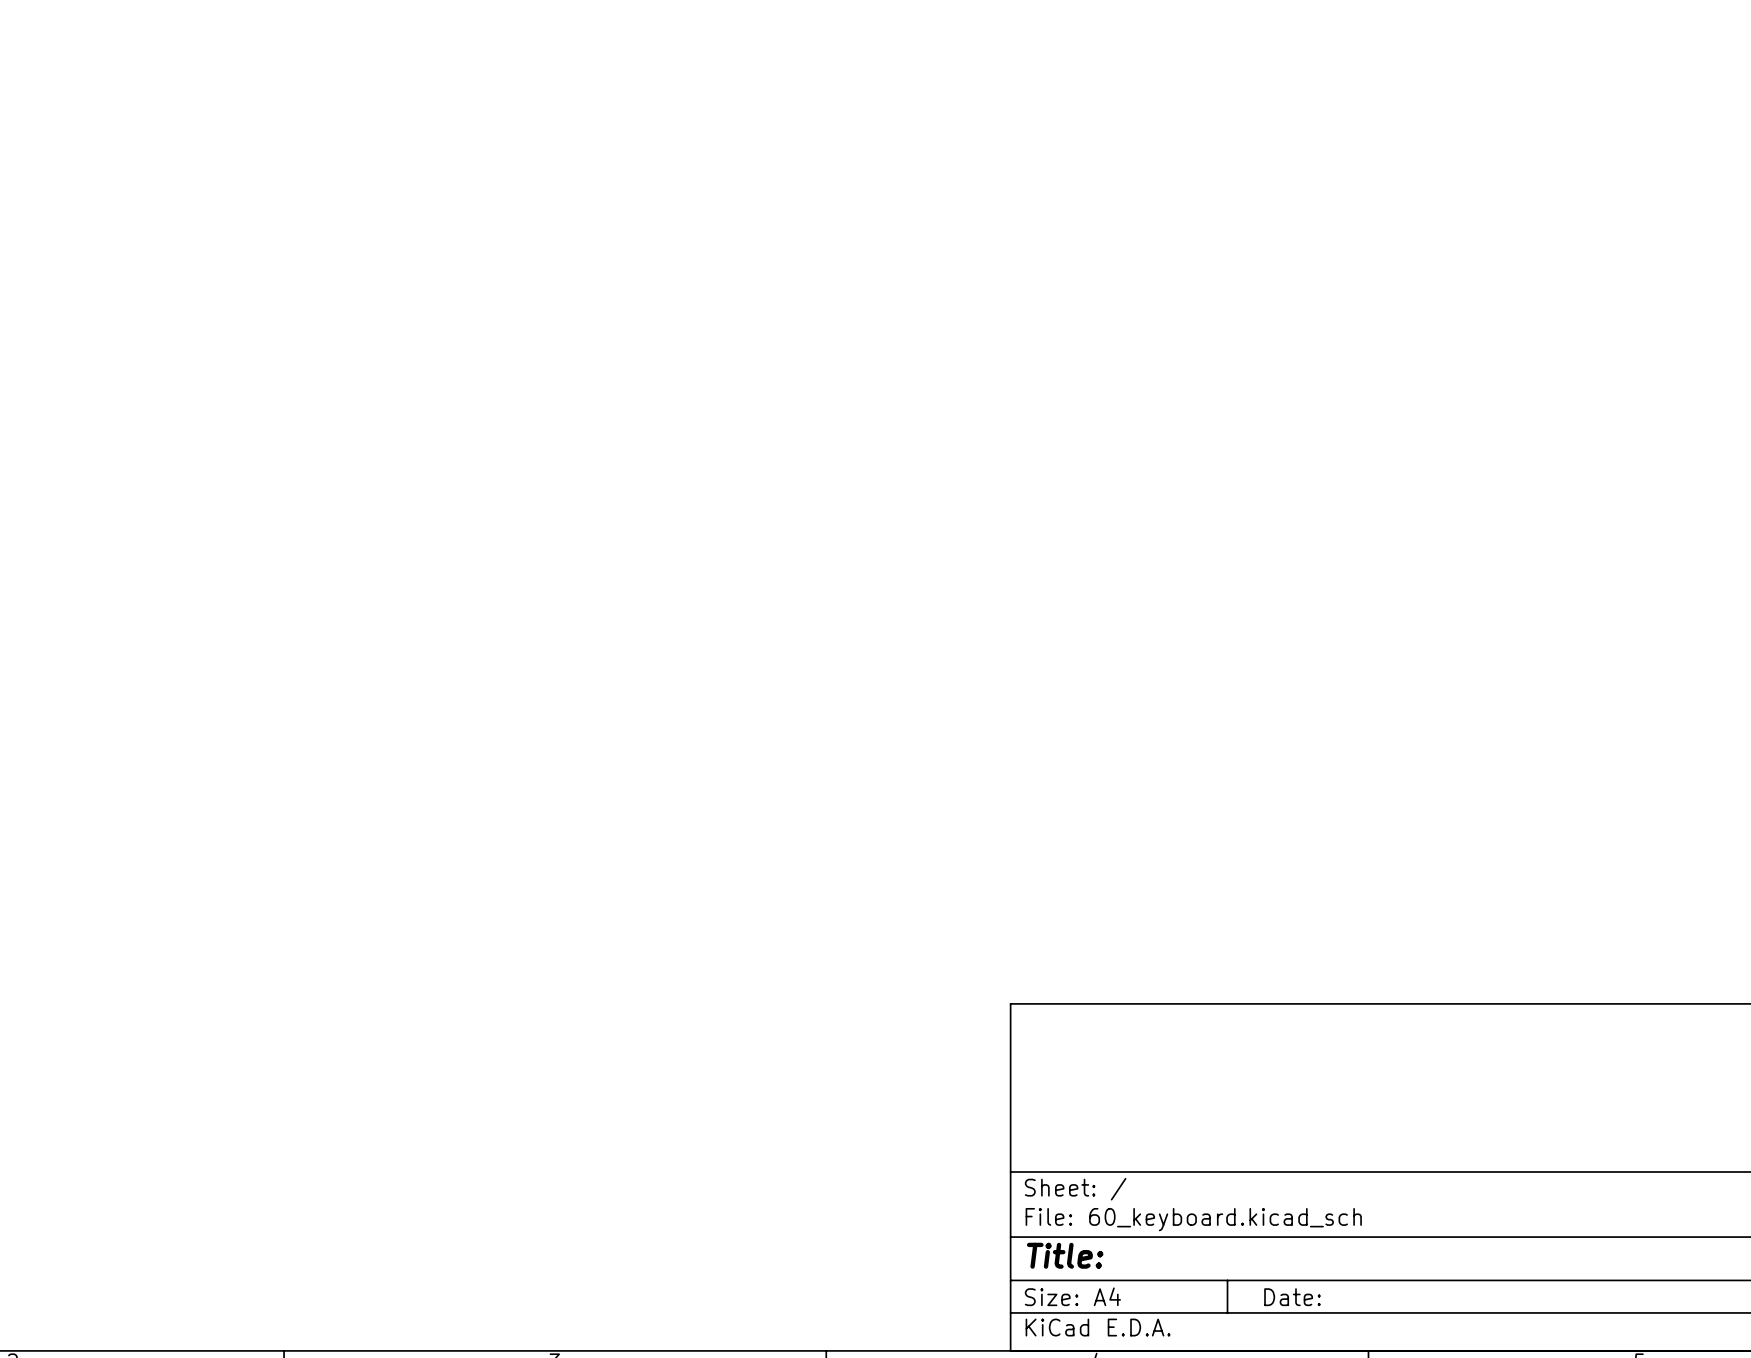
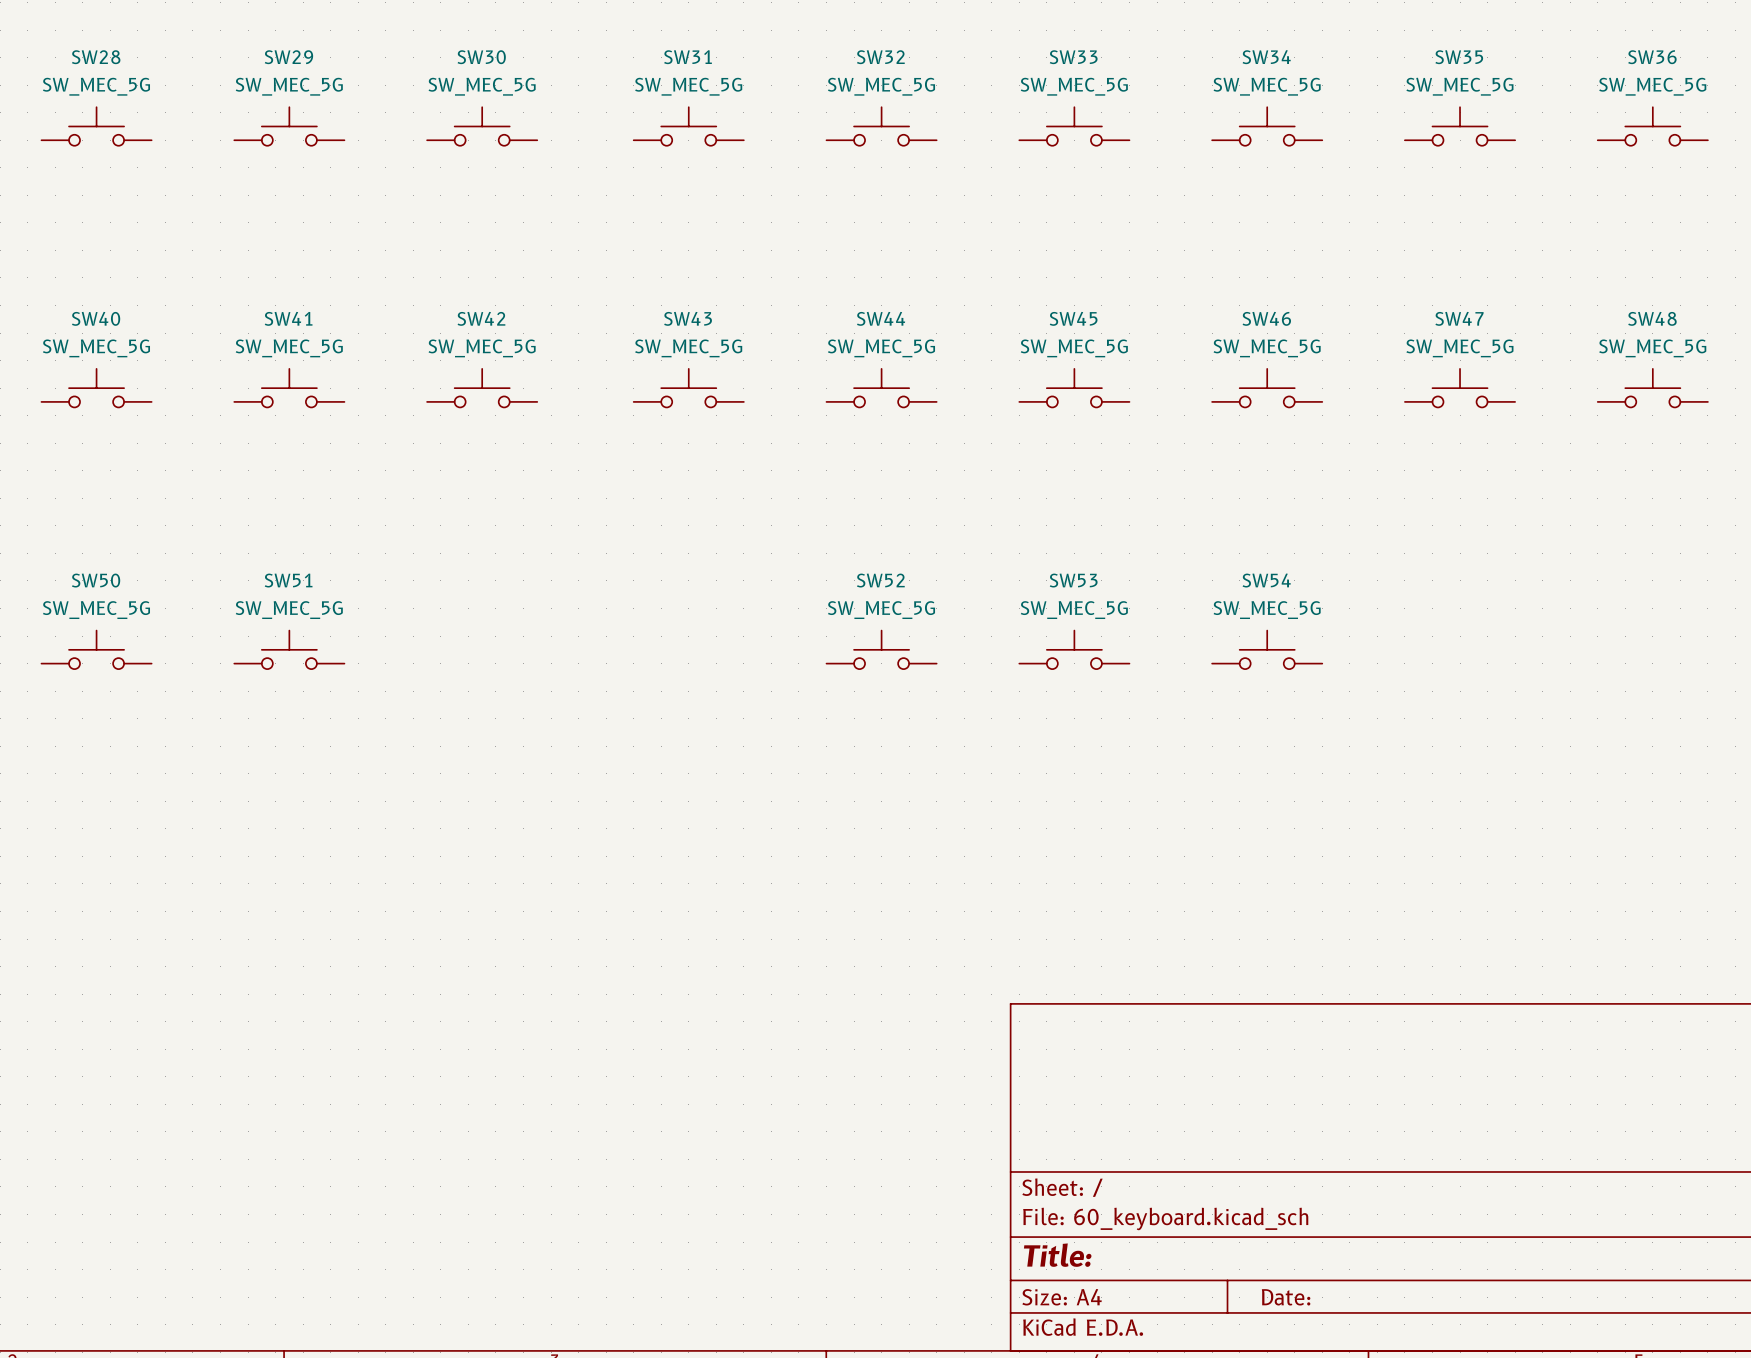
SW28: none -> SW_MEC_5G (96, 126)
SW29: none -> SW_MEC_5G (289, 126)
SW30: none -> SW_MEC_5G (482, 126)
SW31: none -> SW_MEC_5G (688, 126)
SW32: none -> SW_MEC_5G (881, 126)
SW33: none -> SW_MEC_5G (1074, 126)
SW34: none -> SW_MEC_5G (1267, 126)
SW35: none -> SW_MEC_5G (1460, 126)
SW36: none -> SW_MEC_5G (1652, 126)
SW40: none -> SW_MEC_5G (96, 388)
SW41: none -> SW_MEC_5G (289, 388)
SW42: none -> SW_MEC_5G (482, 388)
SW43: none -> SW_MEC_5G (688, 388)
SW44: none -> SW_MEC_5G (881, 388)
SW45: none -> SW_MEC_5G (1074, 388)
SW46: none -> SW_MEC_5G (1267, 388)
SW47: none -> SW_MEC_5G (1460, 388)
SW48: none -> SW_MEC_5G (1652, 388)
SW50: none -> SW_MEC_5G (96, 649)
SW51: none -> SW_MEC_5G (289, 649)
SW52: none -> SW_MEC_5G (881, 649)
SW53: none -> SW_MEC_5G (1074, 649)
SW54: none -> SW_MEC_5G (1267, 649)

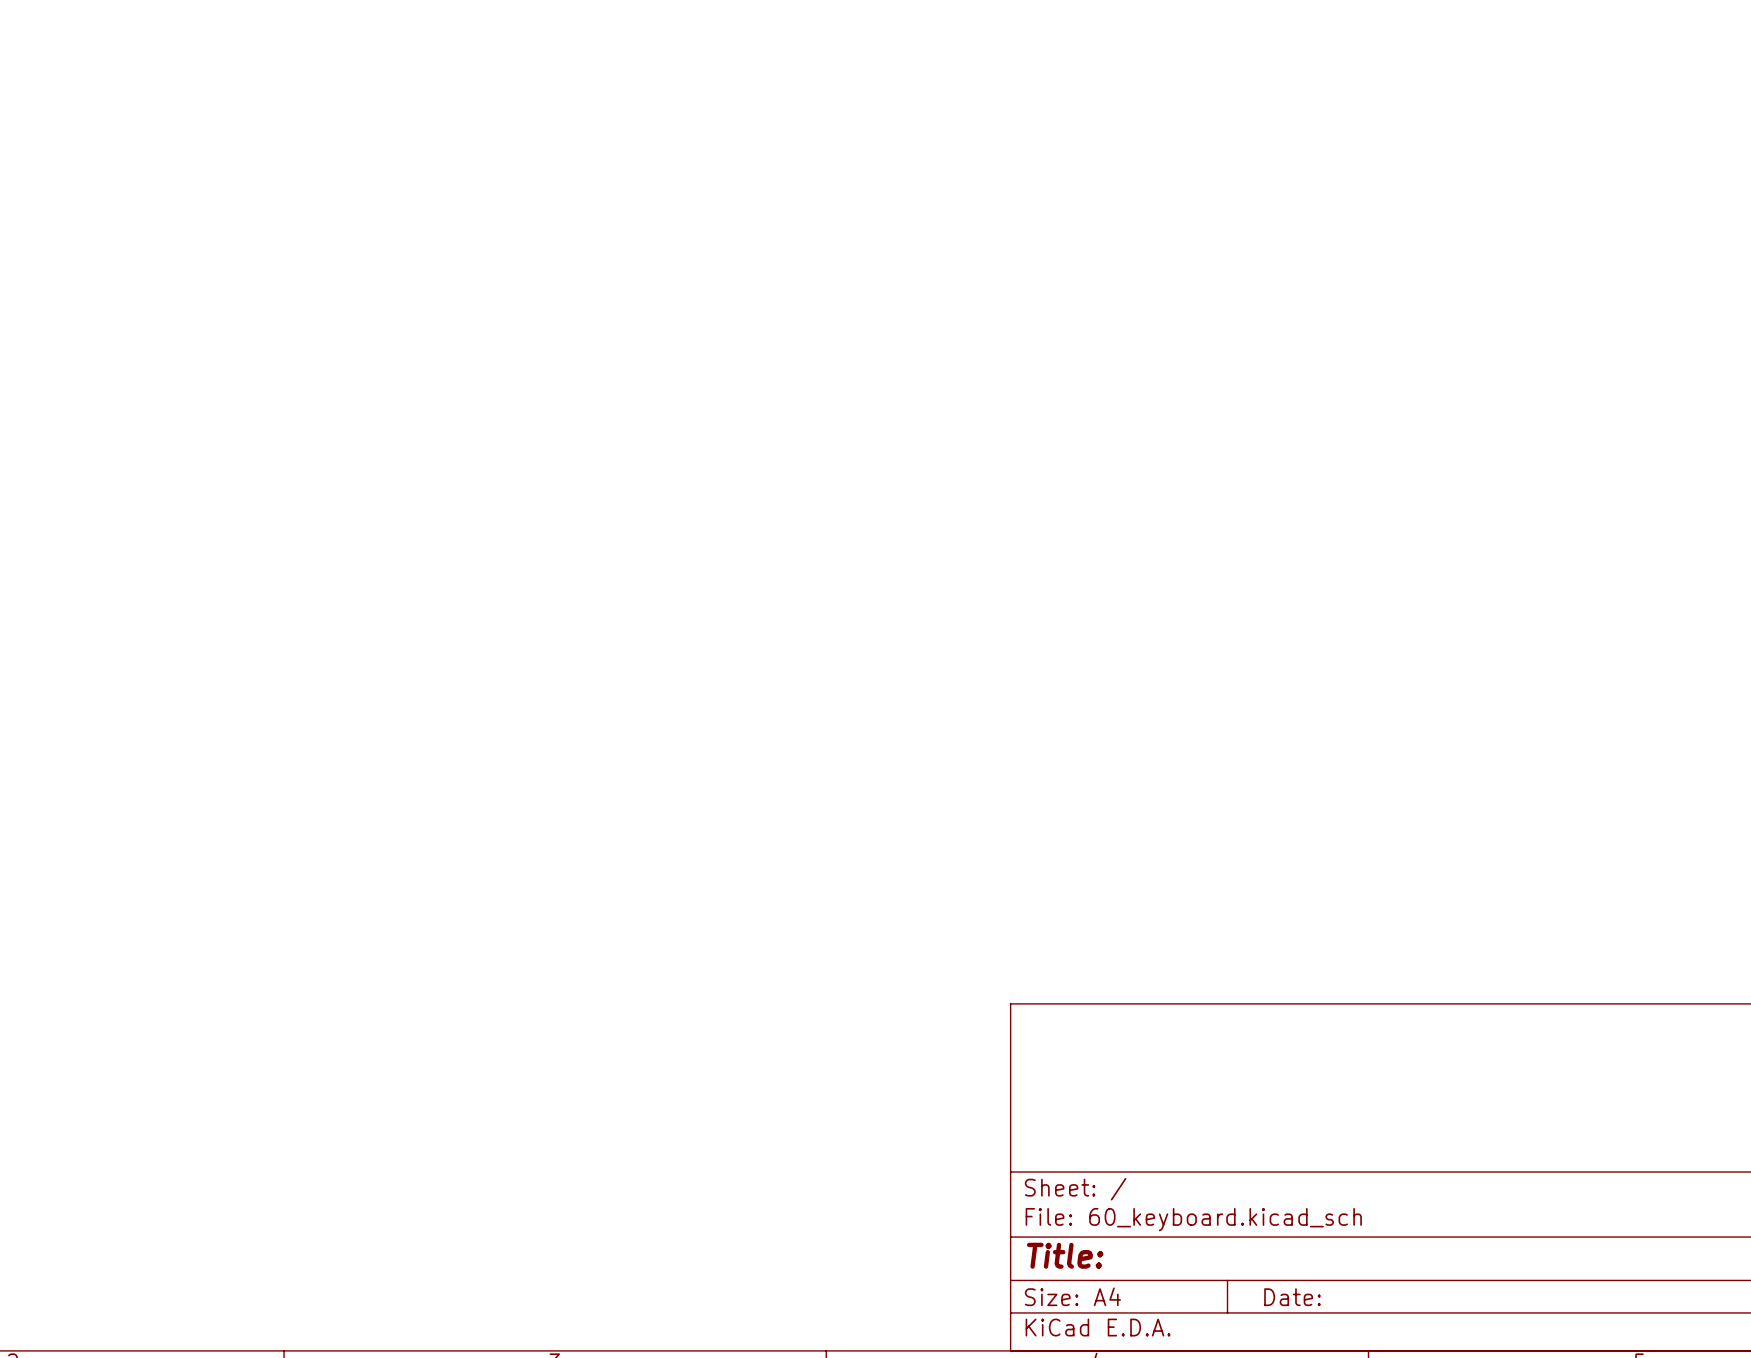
SW28: SW_MEC_5G (96, 126) -> none
SW29: SW_MEC_5G (289, 126) -> none
SW30: SW_MEC_5G (482, 126) -> none
SW31: SW_MEC_5G (688, 126) -> none
SW32: SW_MEC_5G (881, 126) -> none
SW33: SW_MEC_5G (1074, 126) -> none
SW34: SW_MEC_5G (1267, 126) -> none
SW35: SW_MEC_5G (1460, 126) -> none
SW36: SW_MEC_5G (1652, 126) -> none
SW40: SW_MEC_5G (96, 388) -> none
SW41: SW_MEC_5G (289, 388) -> none
SW42: SW_MEC_5G (482, 388) -> none
SW43: SW_MEC_5G (688, 388) -> none
SW44: SW_MEC_5G (881, 388) -> none
SW45: SW_MEC_5G (1074, 388) -> none
SW46: SW_MEC_5G (1267, 388) -> none
SW47: SW_MEC_5G (1460, 388) -> none
SW48: SW_MEC_5G (1652, 388) -> none
SW50: SW_MEC_5G (96, 649) -> none
SW51: SW_MEC_5G (289, 649) -> none
SW52: SW_MEC_5G (881, 649) -> none
SW53: SW_MEC_5G (1074, 649) -> none
SW54: SW_MEC_5G (1267, 649) -> none

